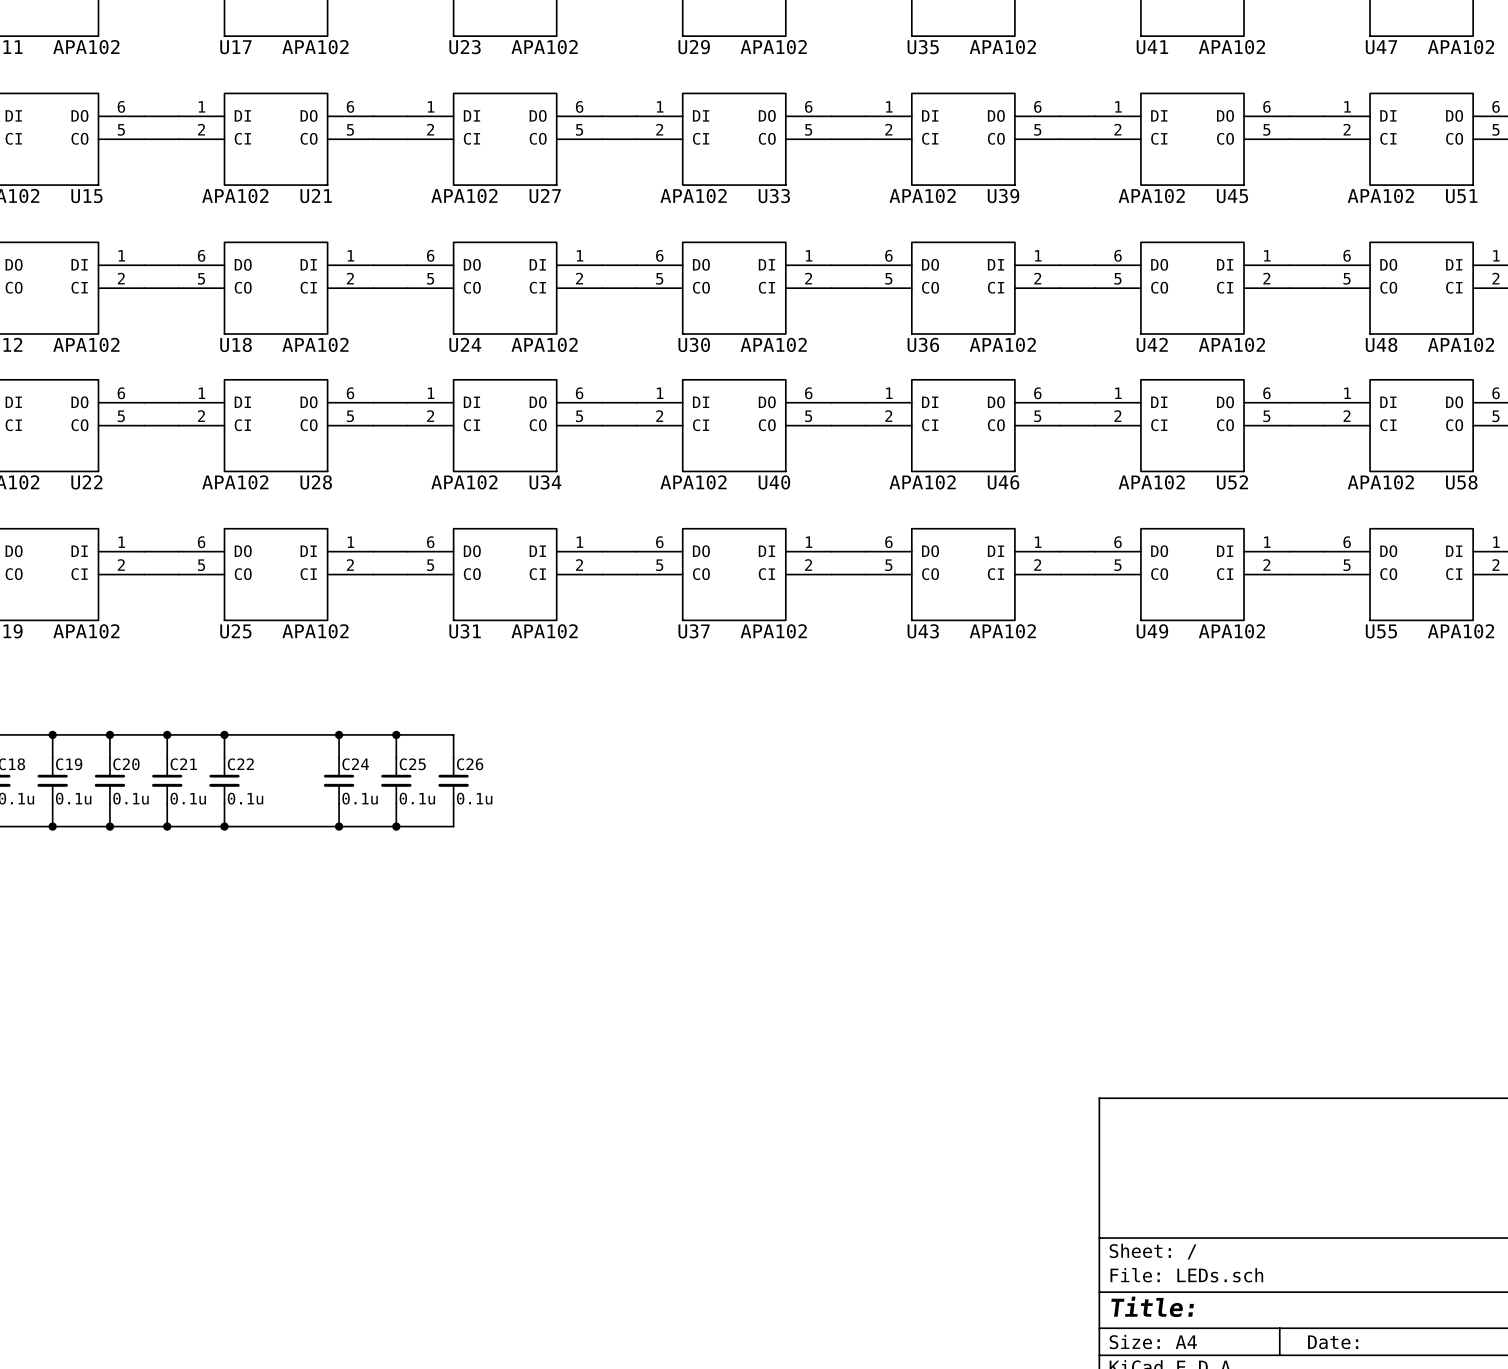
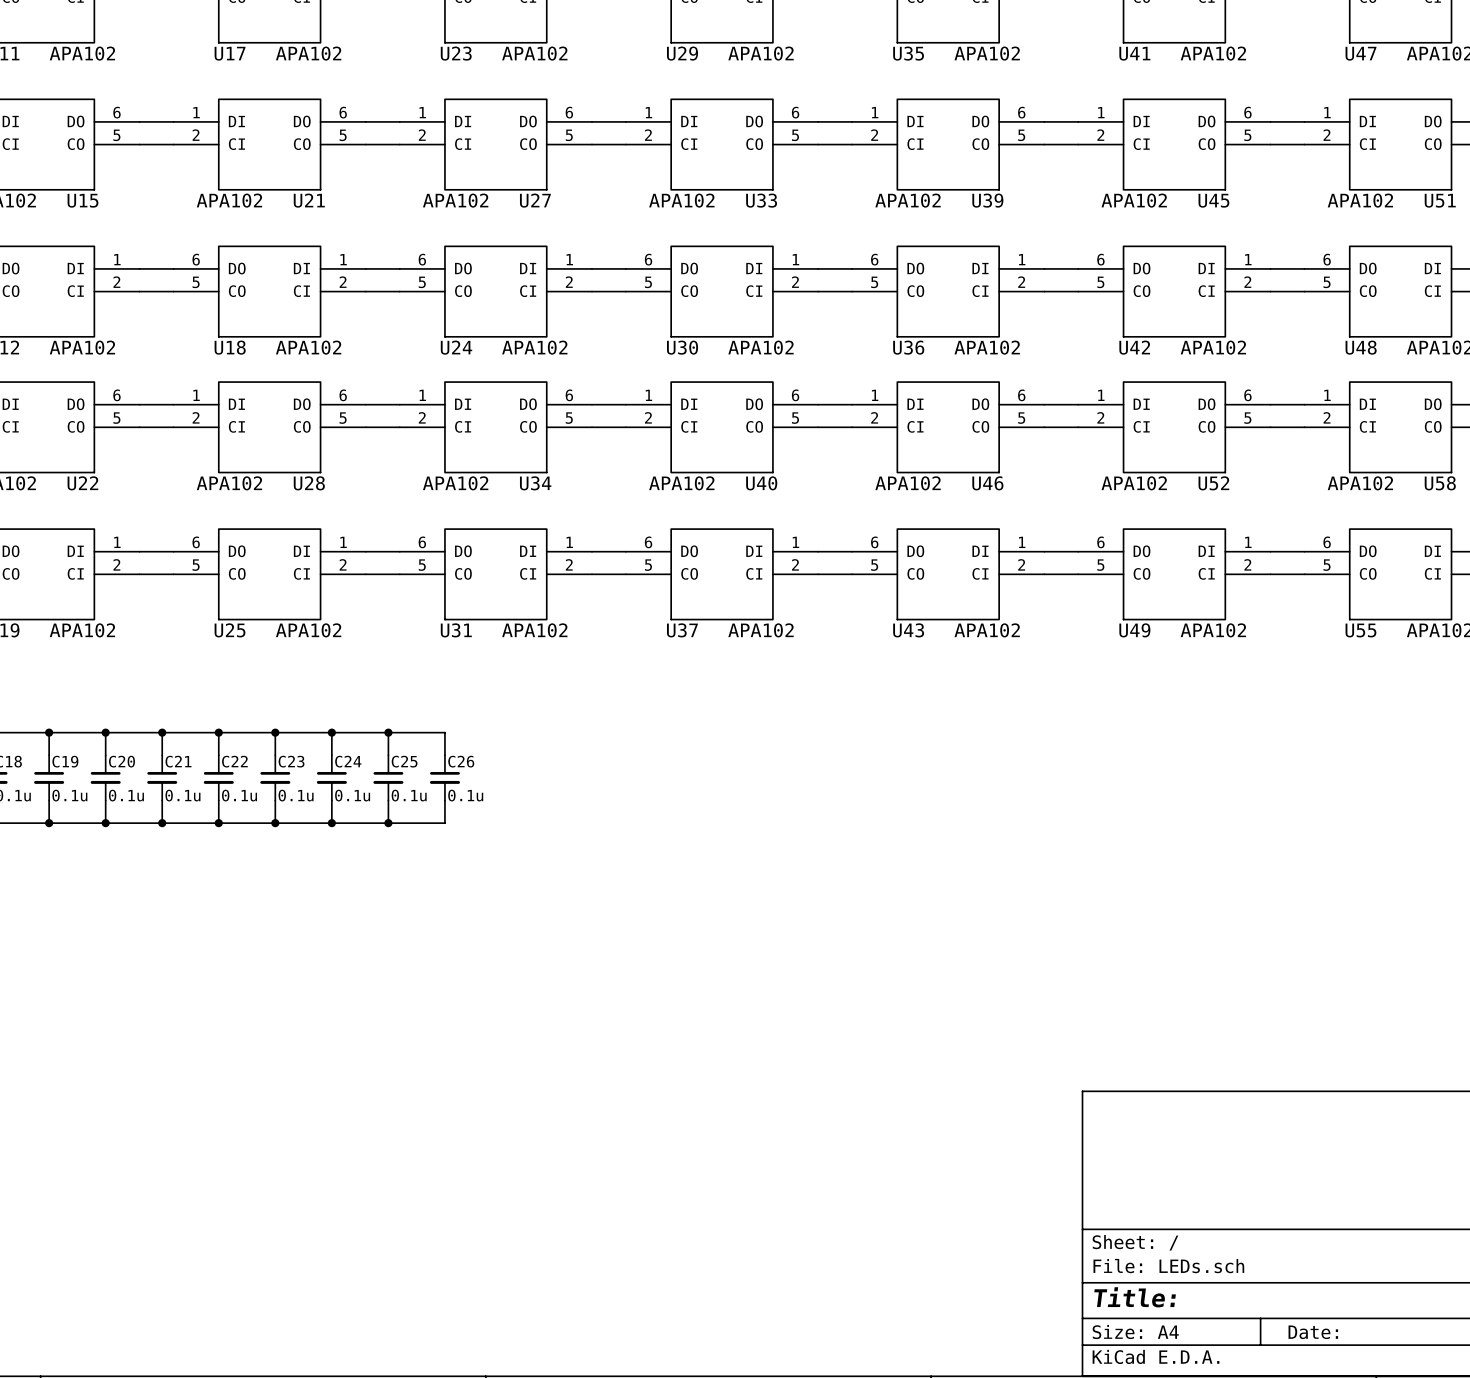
wire: none -> (275, 732) (275, 755)
junction: none -> (275, 732)
C23: none -> 0.1u (275, 777)
wire: none -> (275, 800) (275, 823)
junction: none -> (275, 823)

